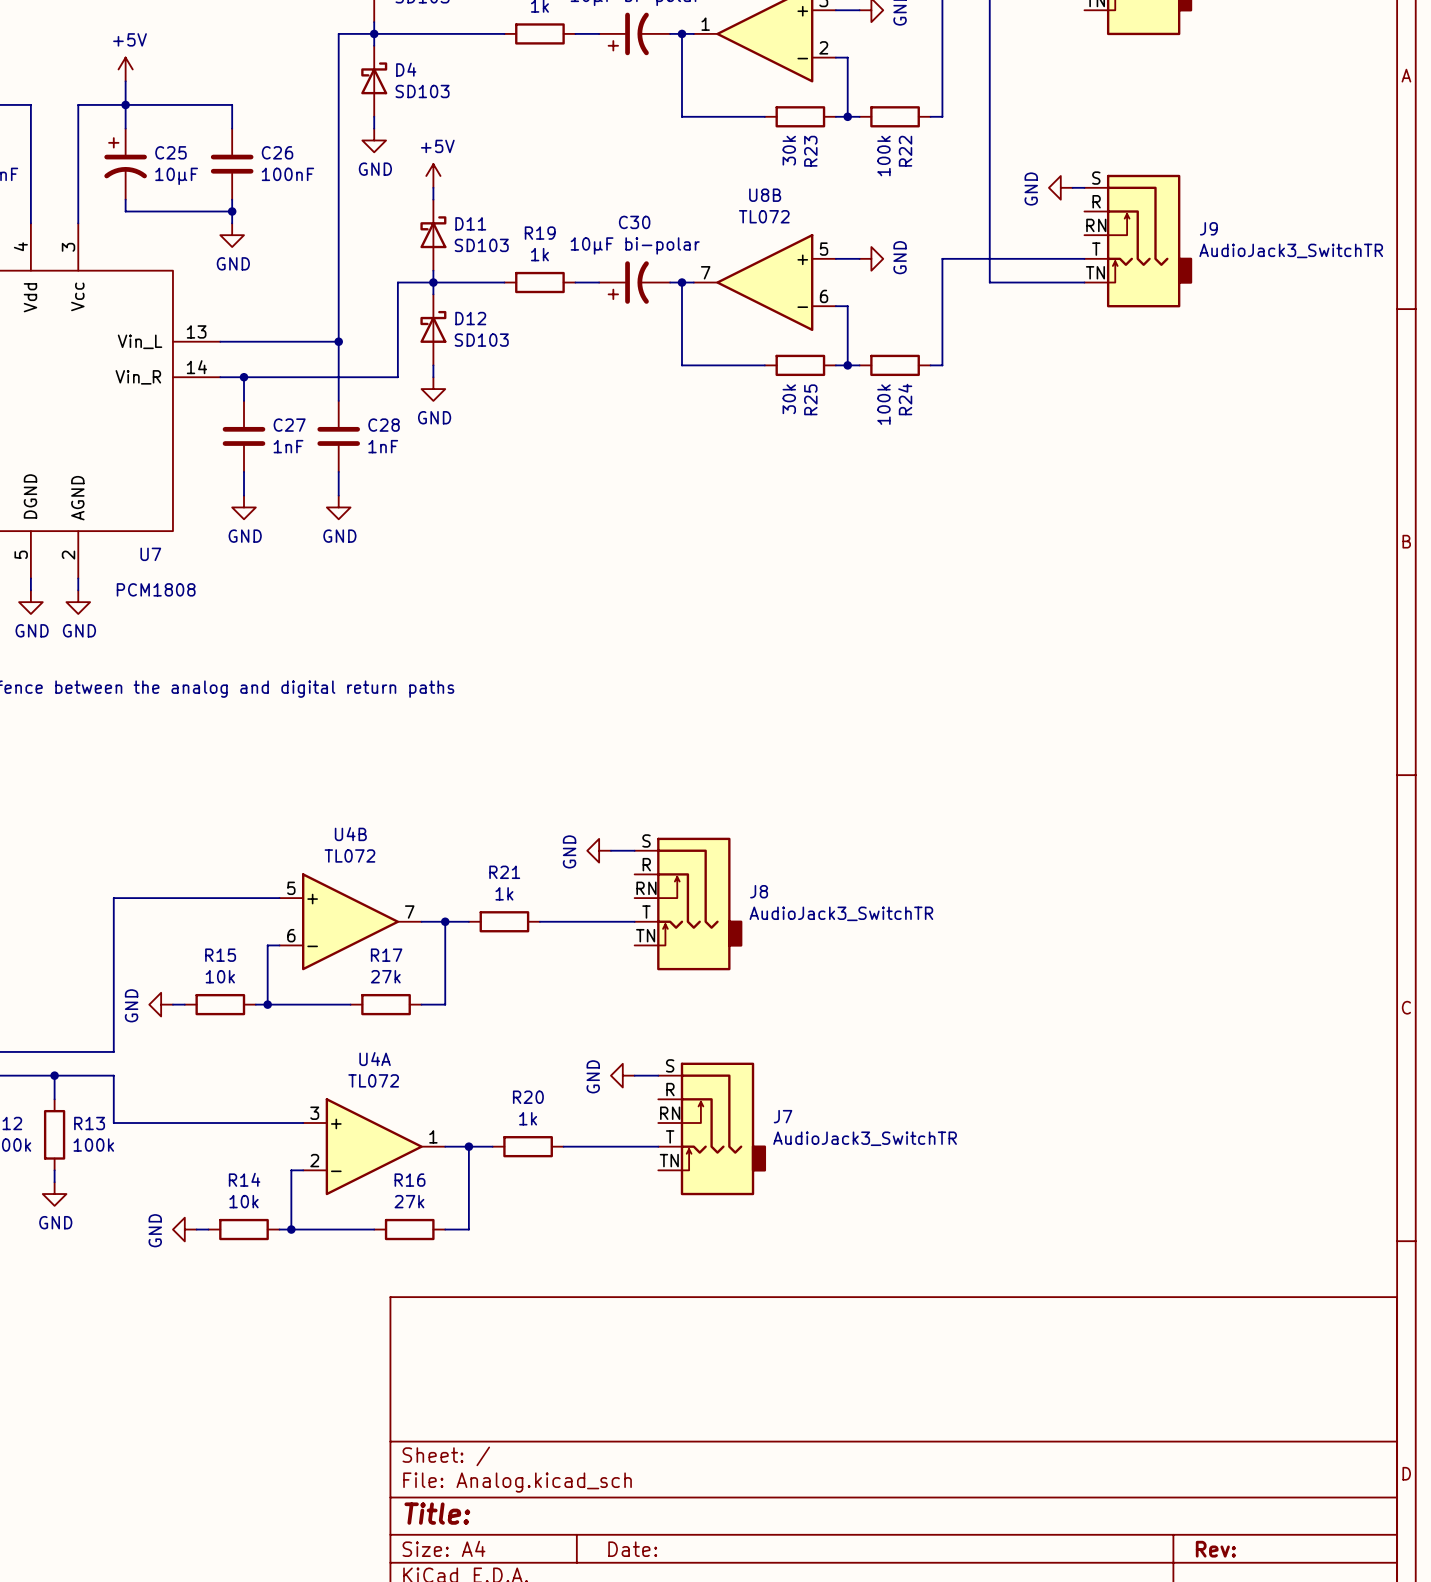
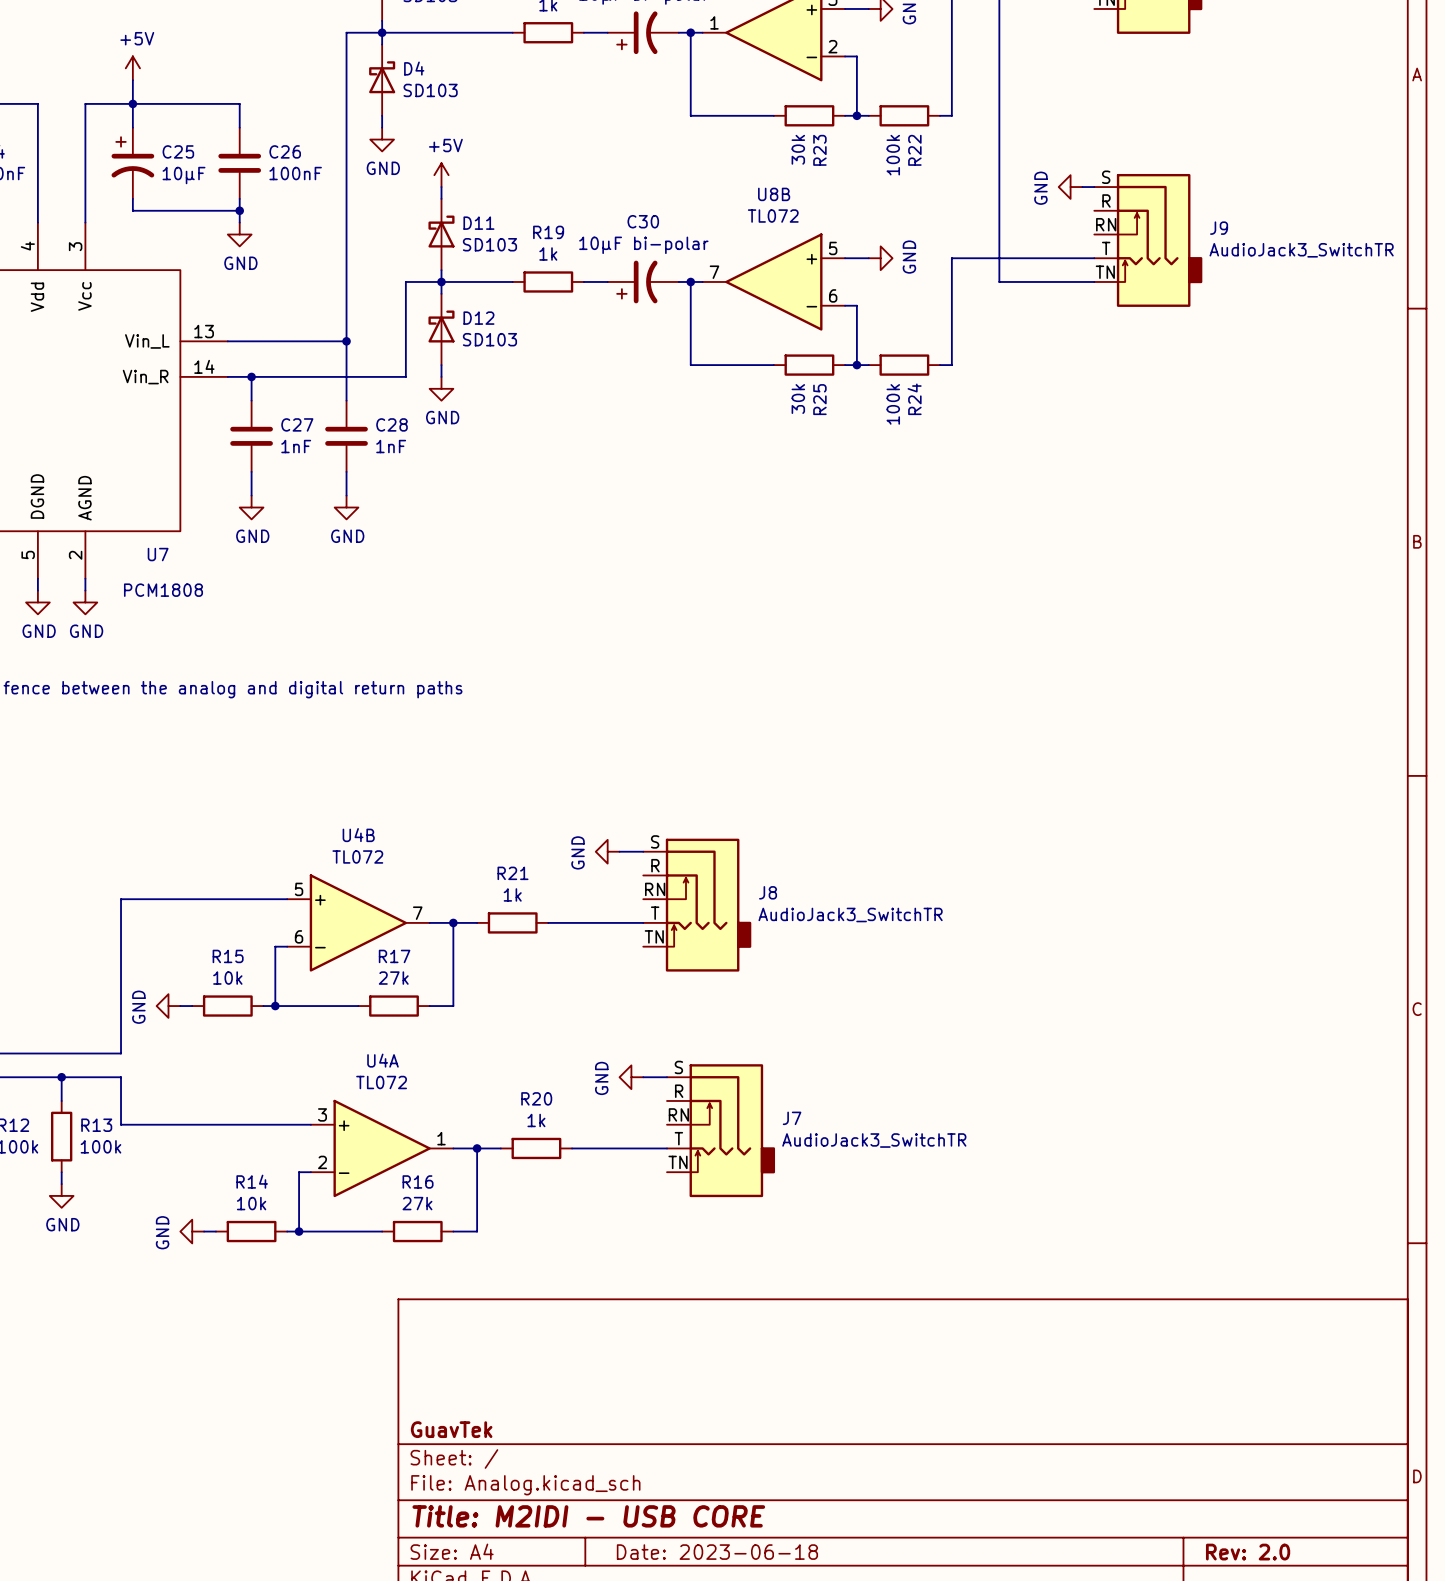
title block: none -> GuavTek (451, 1429)
title block: Title: (437, 1513) -> Title: M2IDI - USB CORE (588, 1516)
title block: Date: (632, 1549) -> Date: 2023-06-18 (717, 1552)
title block: Rev: (1215, 1549) -> Rev: 2.0 (1248, 1552)

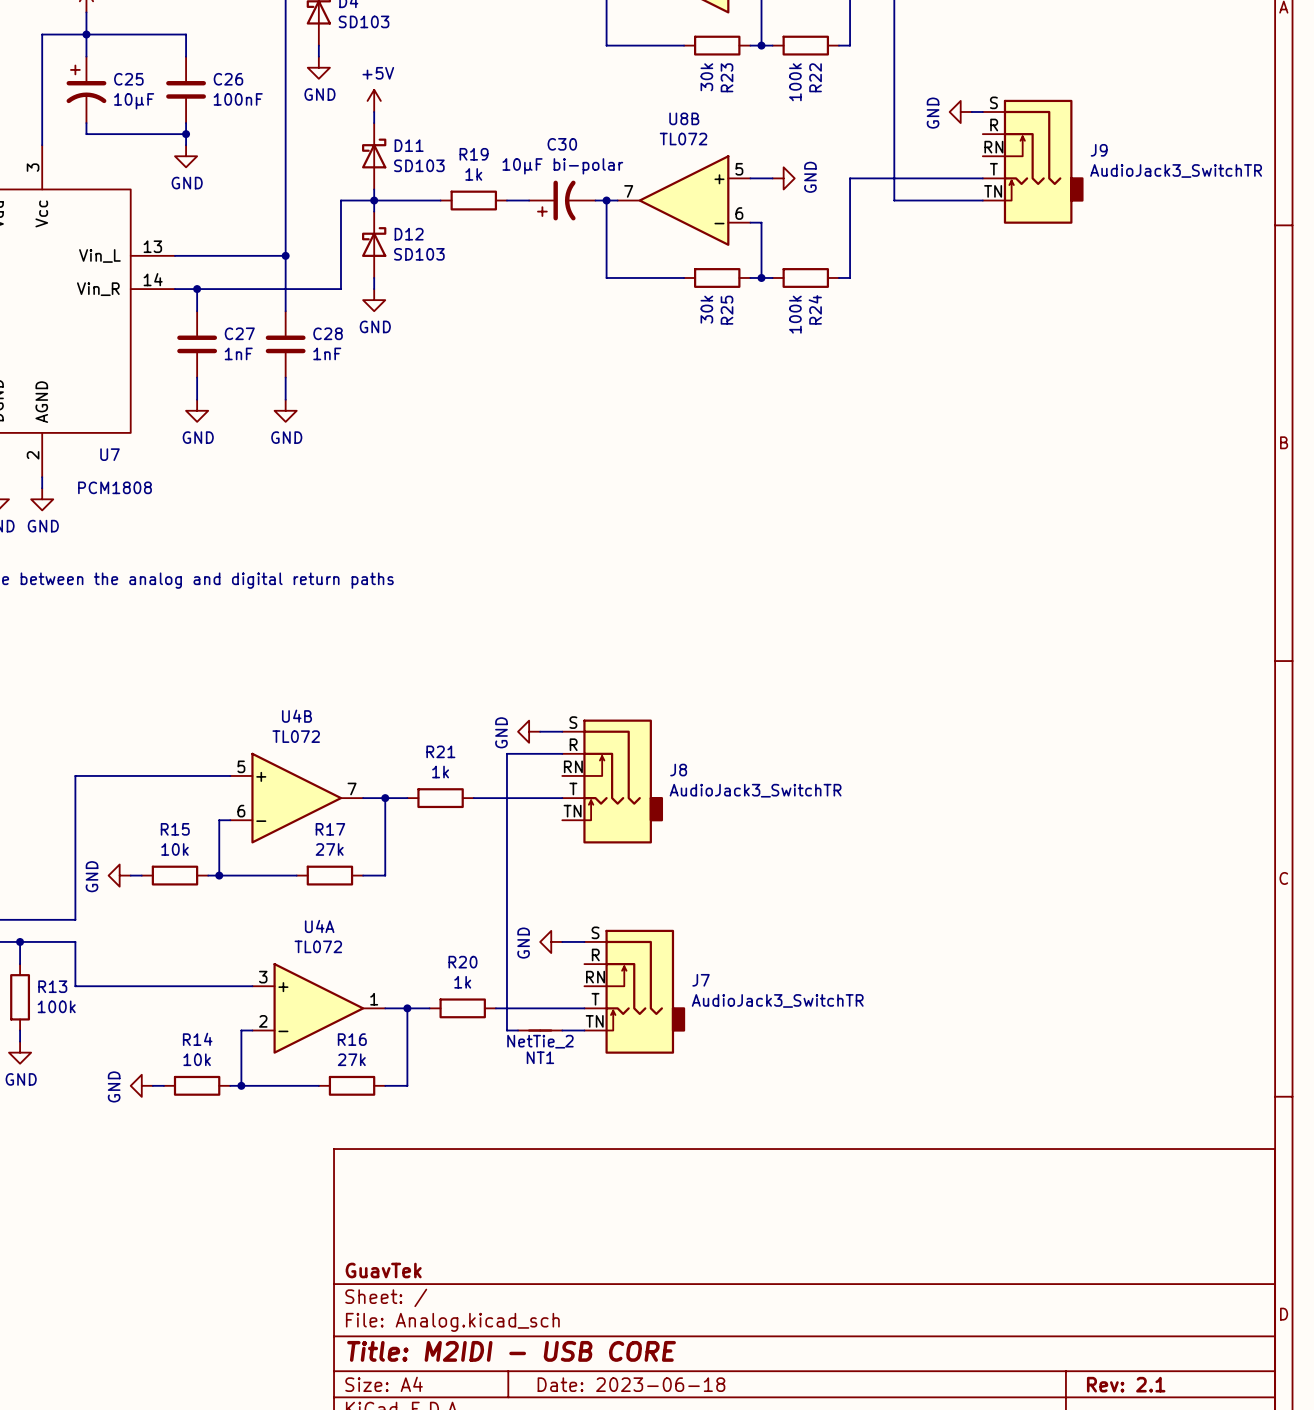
wire: none -> (562, 753) (506, 753) (506, 1030) (518, 1030)
NT1: none -> NetTie_2 (540, 1030)
wire: none -> (562, 1030) (584, 1030)
title block: Rev: 2.0 (1248, 1552) -> Rev: 2.1 (1126, 1384)

